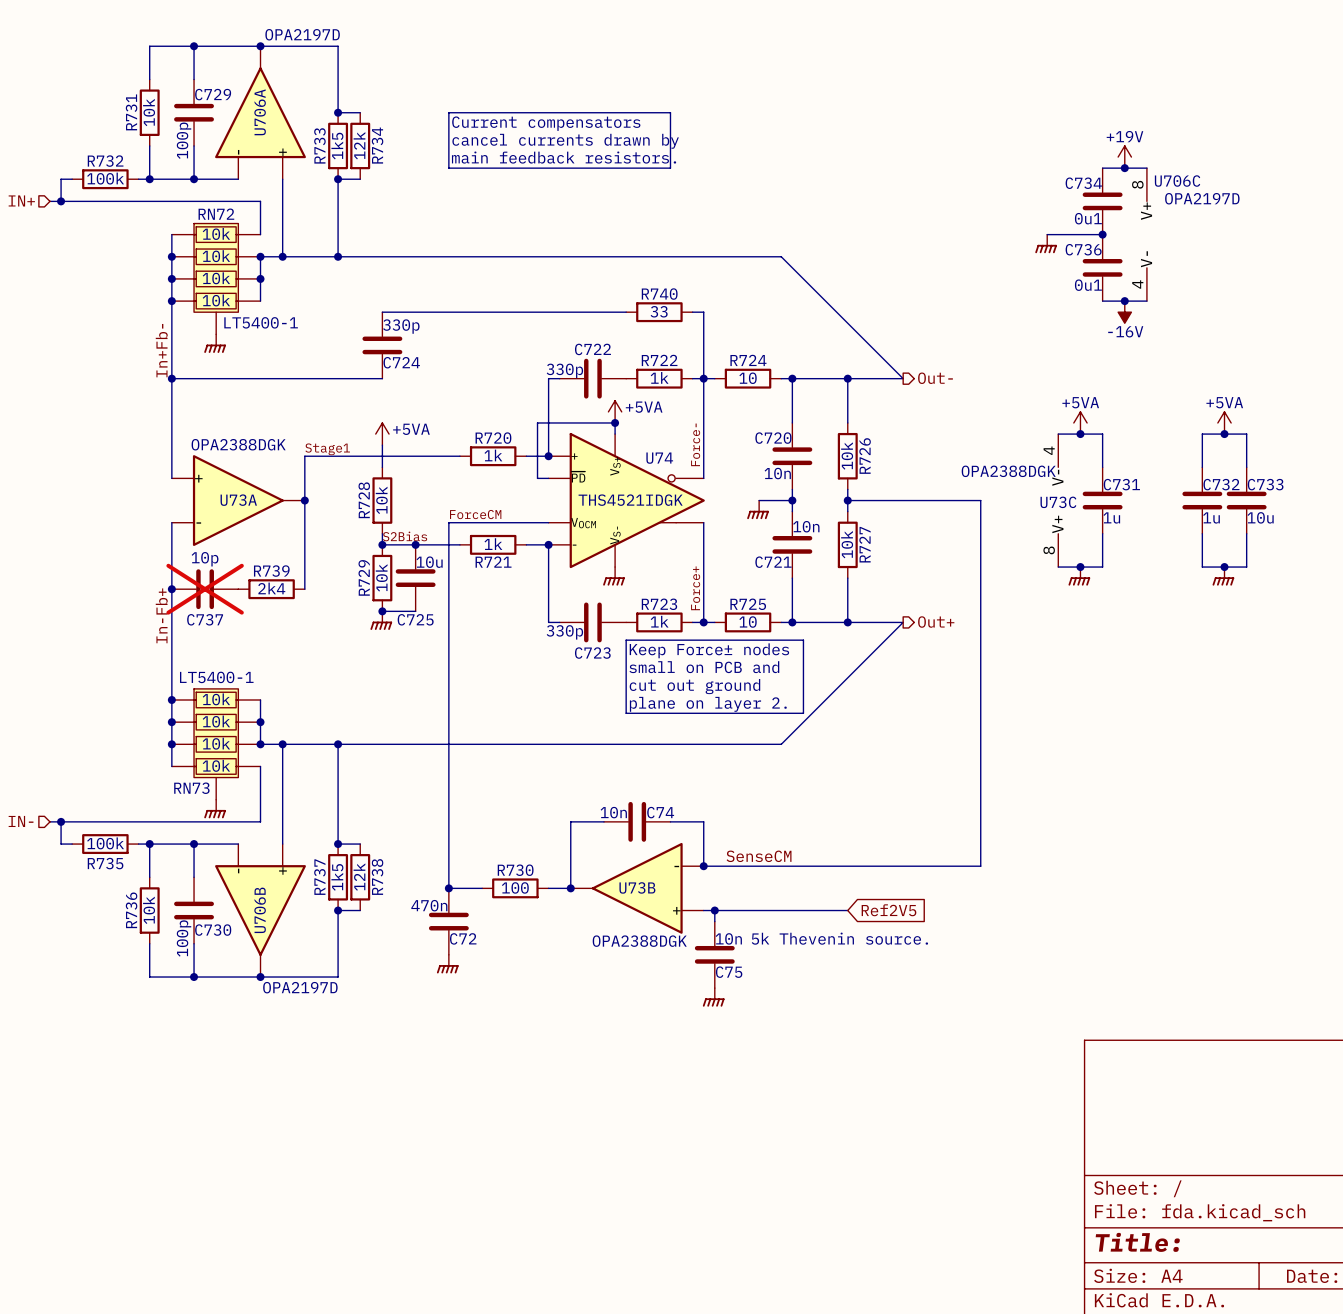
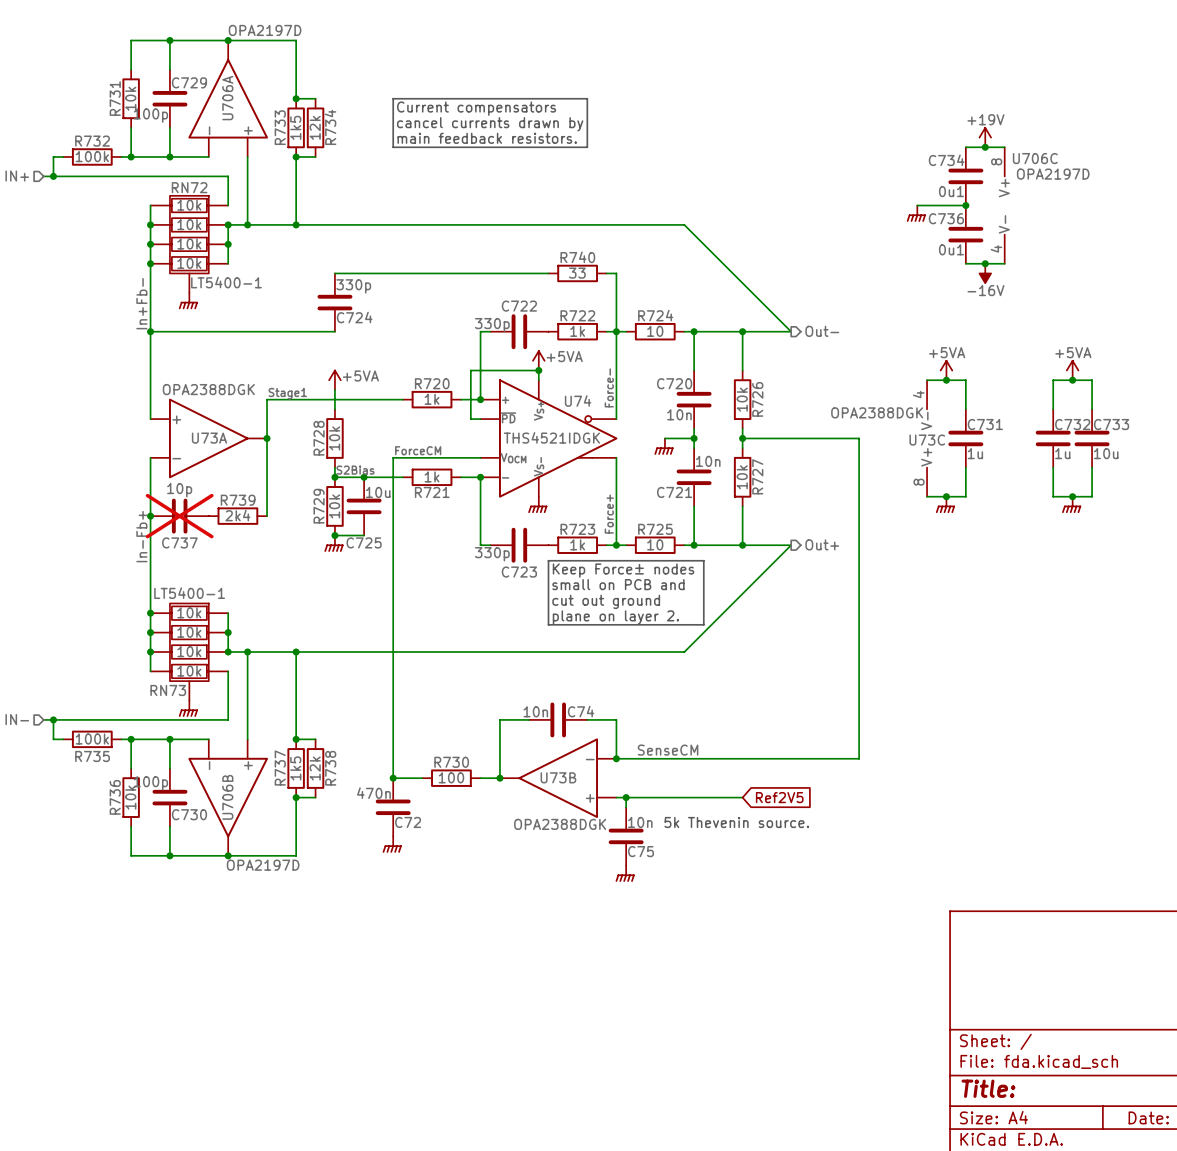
C729 value rotation: 0° (184, 140) -> 90° clockwise (150, 115)
RN72 flip: as is (205, 267) -> left-right (199, 234)
RN73 flip: as is (205, 733) -> left-right (199, 642)
C730 value rotation: 0° (184, 938) -> 90° clockwise (150, 783)
C730 value position: 100p (184, 938) -> 100p (150, 783)

